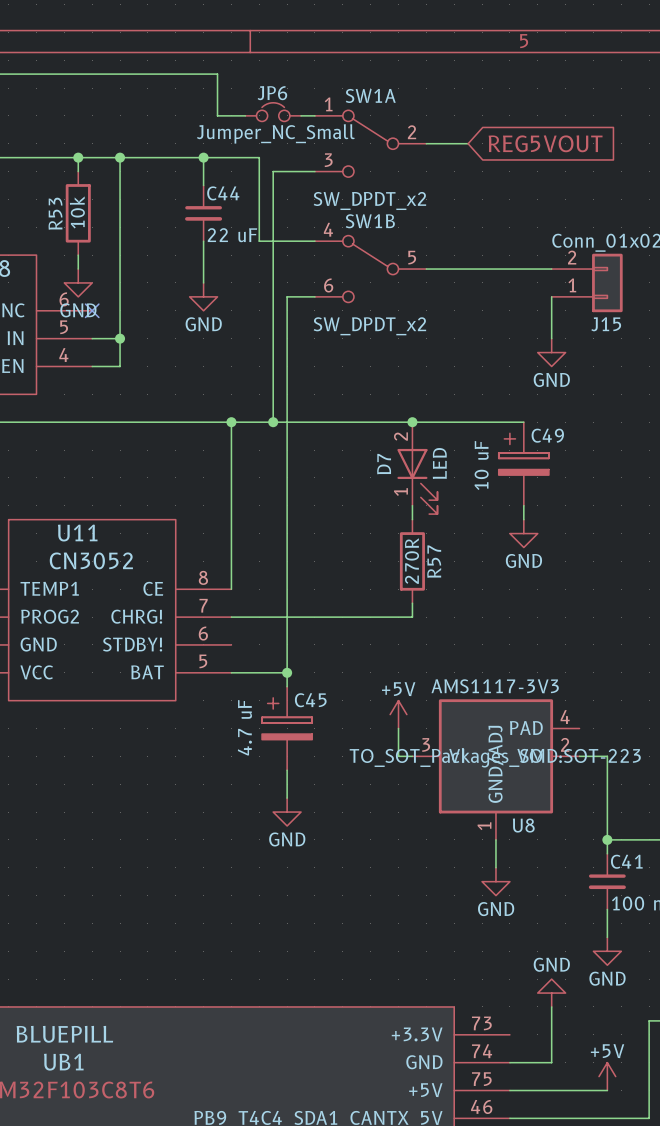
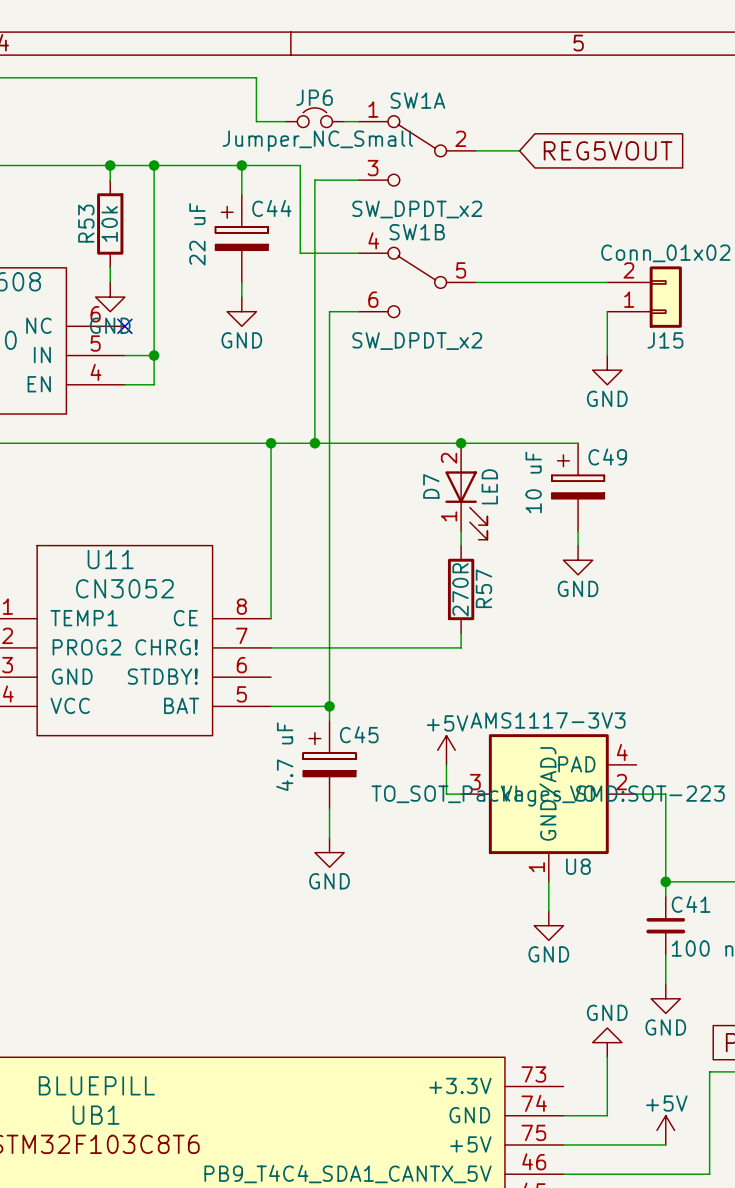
C44 symbol: [185, 185, 223, 242] -> [215, 194, 269, 283]
C44 value position: 22 uF (232, 235) -> 22 uF (197, 234)

